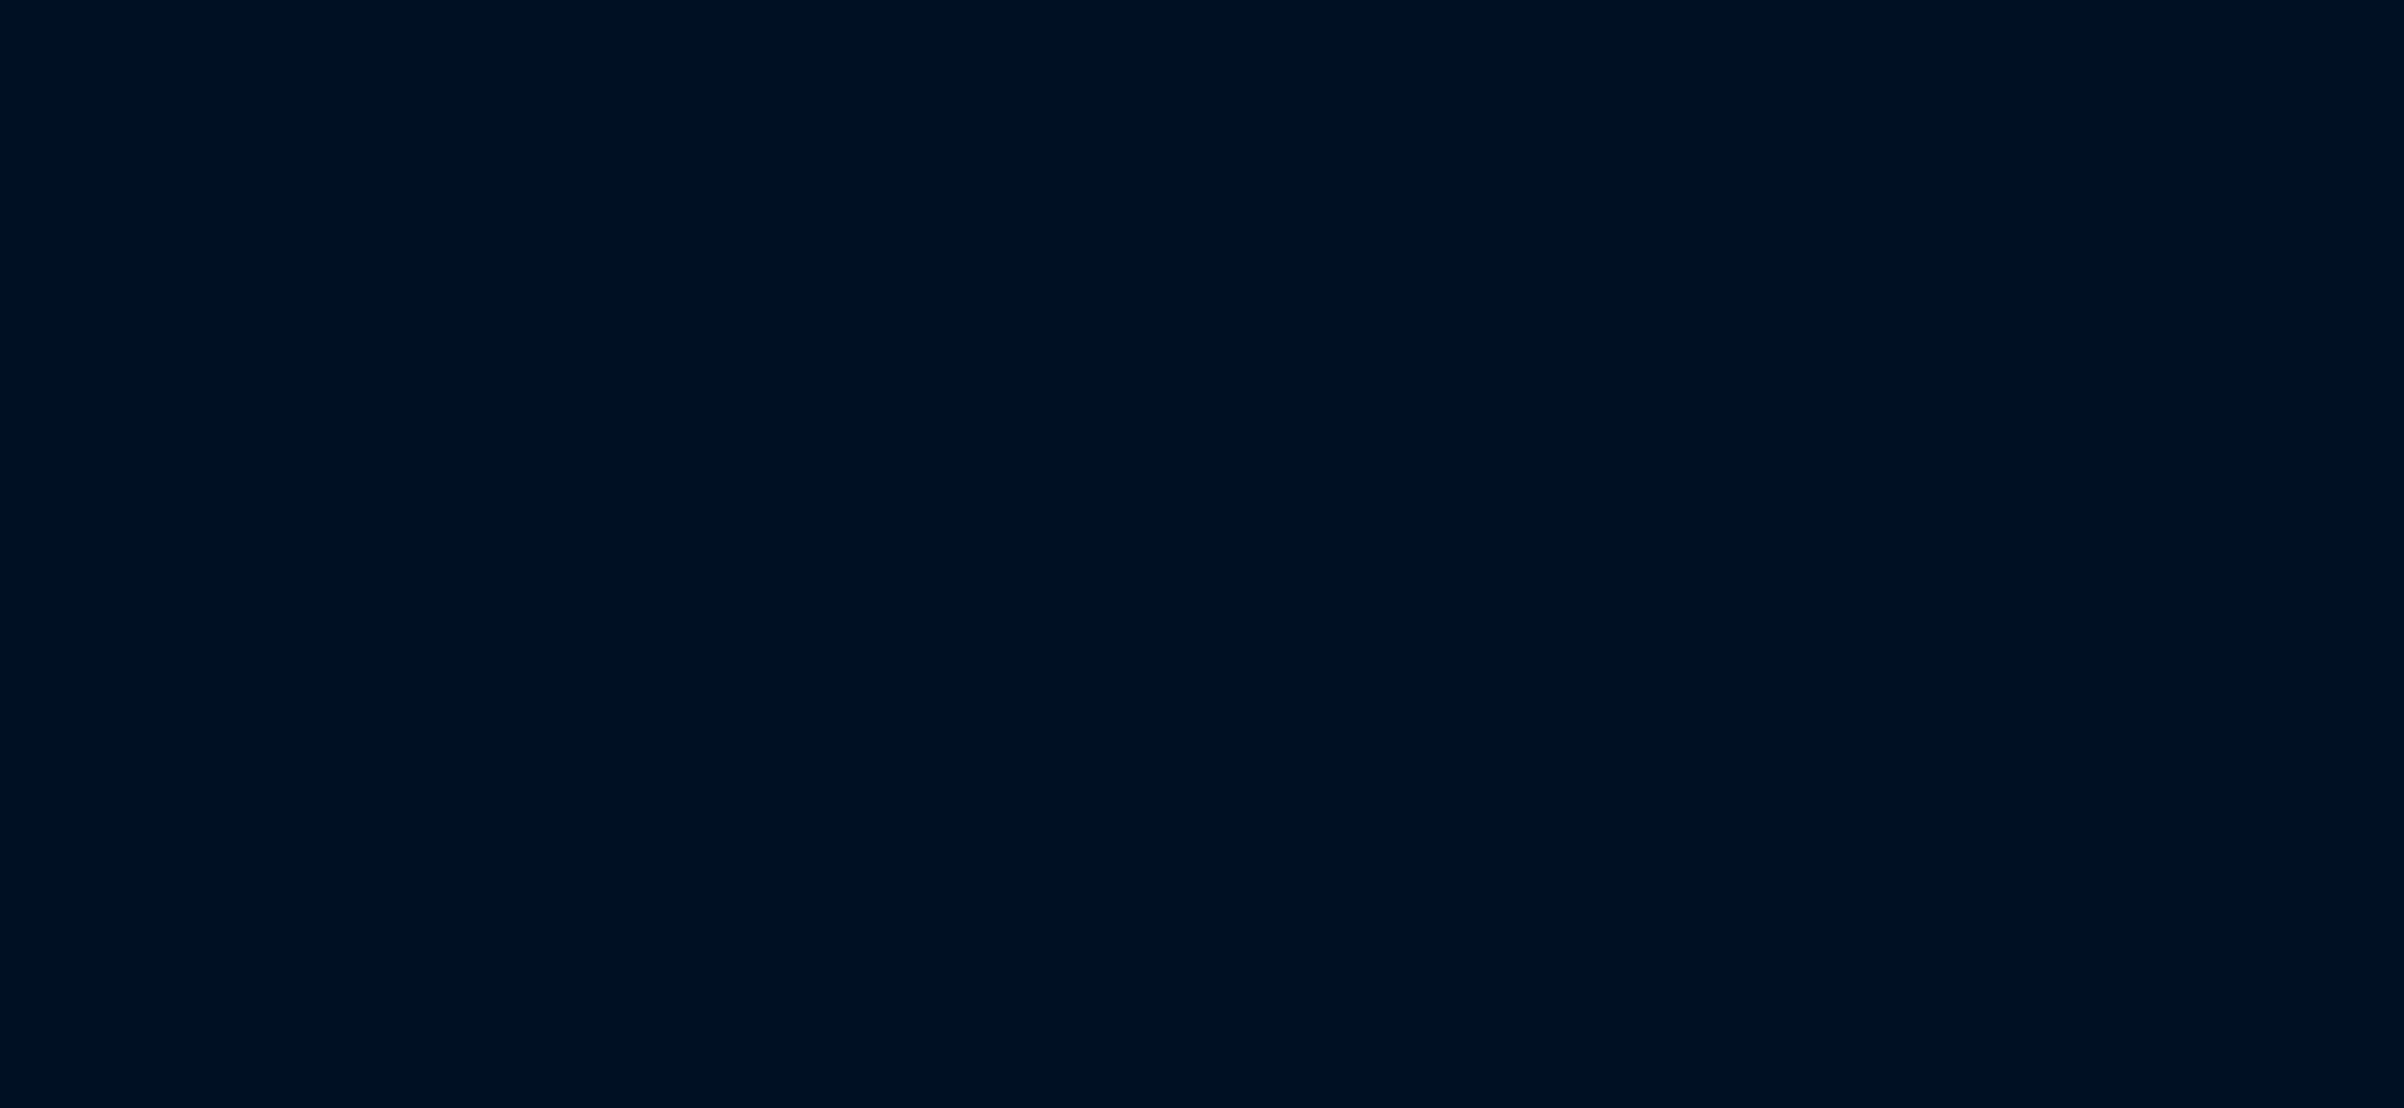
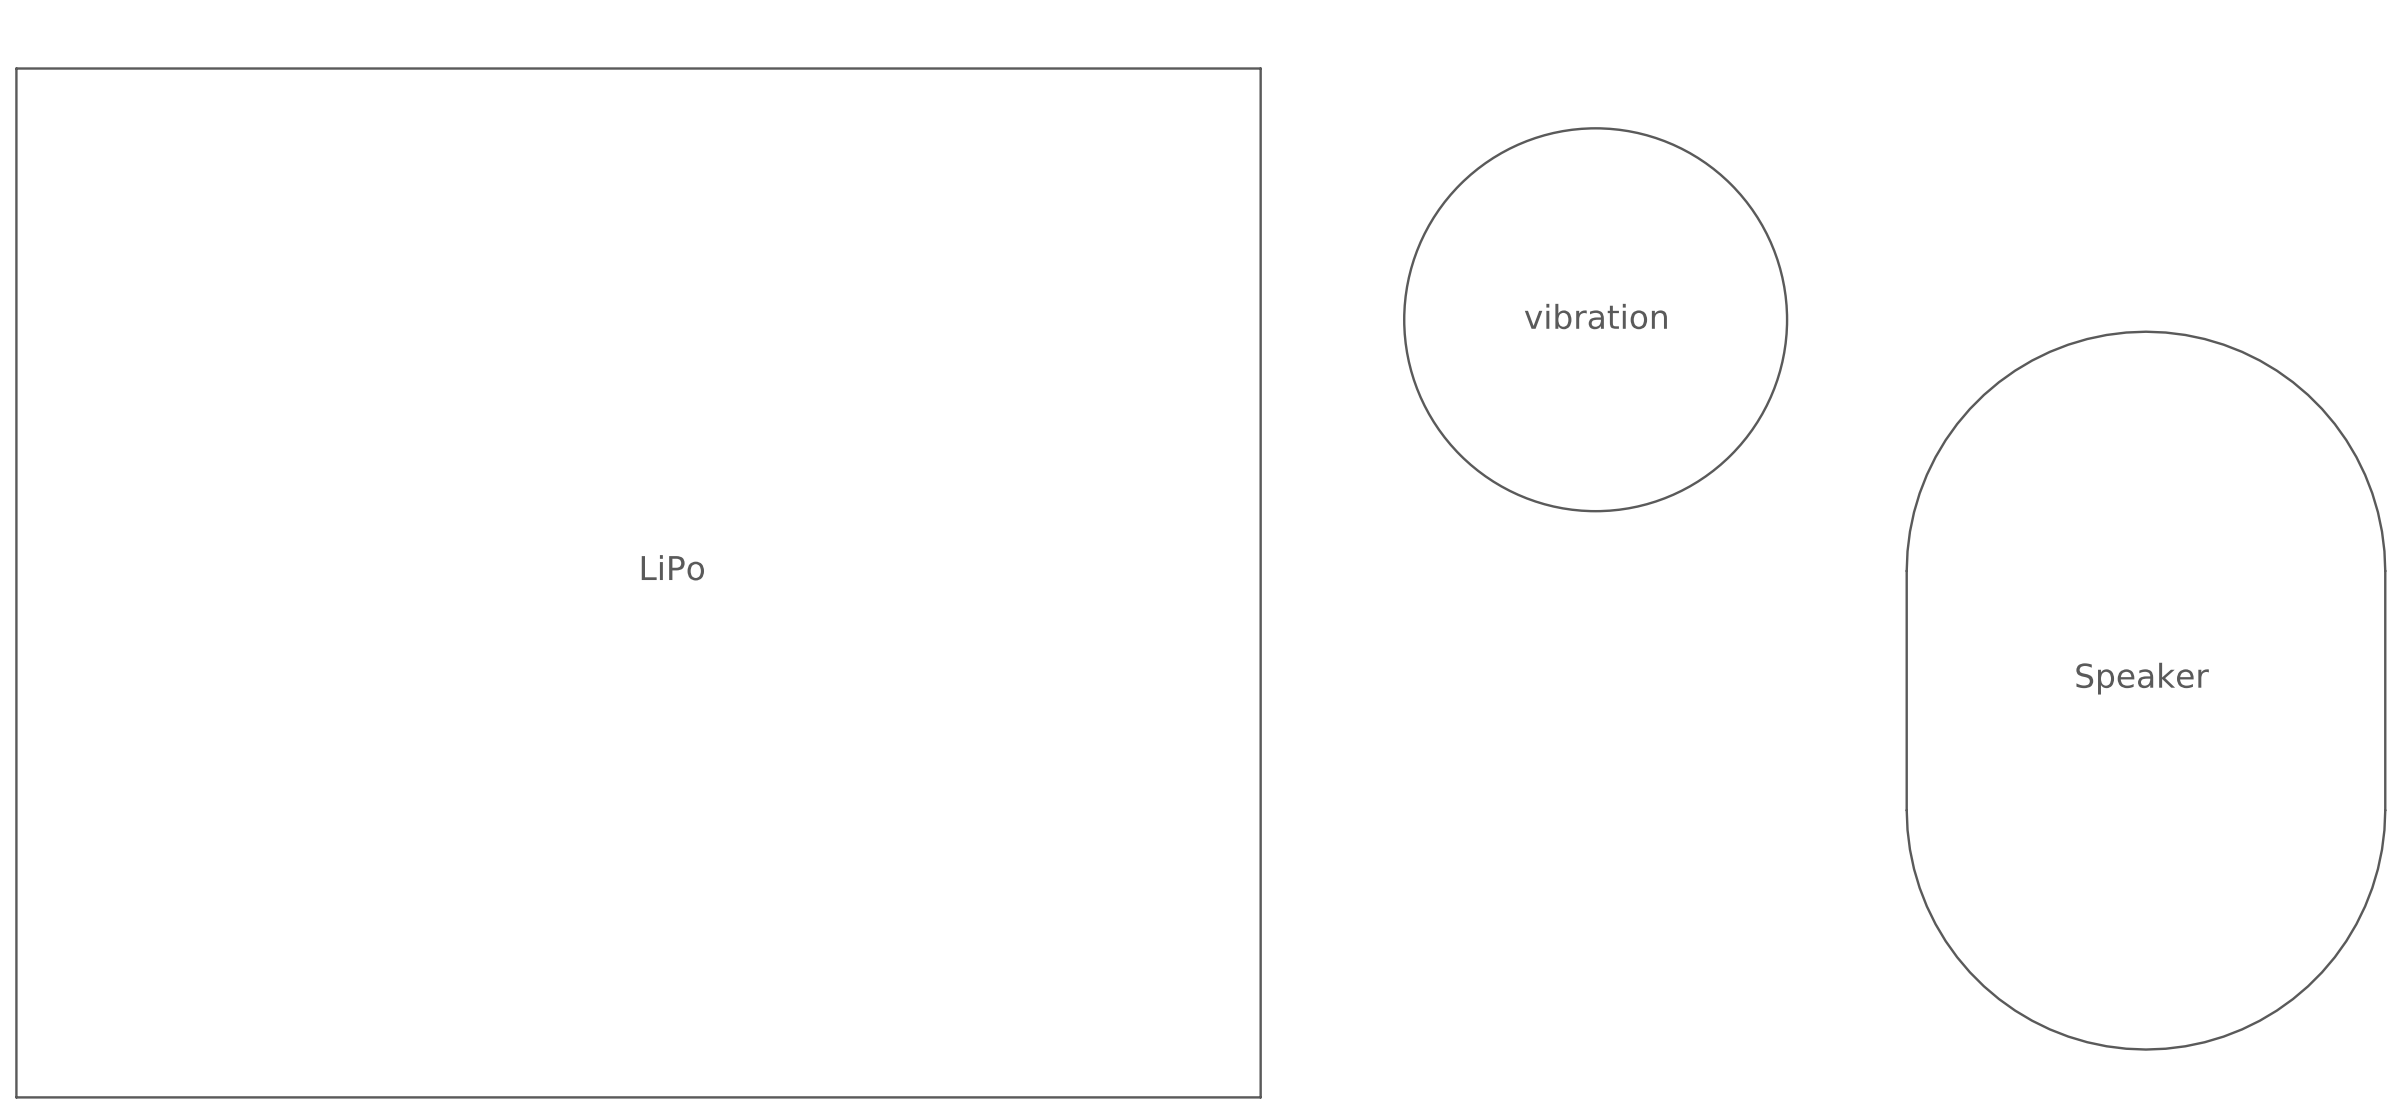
line: none -> (16, 68) (1260, 68) (1260, 1097) (16, 1097) (16, 68)
drawing: none -> [1403, 127, 1789, 513]
text: none -> vibration (1595, 316)
text: none -> LiPo (672, 567)
line: none -> (1906, 570) (1906, 810) (1909, 849) (1919, 887) (1935, 924) (1945, 941) (1969, 972) (1999, 999) (2032, 1020) (2068, 1036) (2087, 1042) (2126, 1048) (2165, 1048) (2204, 1042) (2223, 1036) (2259, 1020) (2276, 1010) (2308, 986) (2322, 972) (2346, 941) (2365, 906) (2377, 869) (2384, 830) (2385, 810) (2385, 570) (2382, 531) (2372, 493) (2356, 457) (2346, 440) (2322, 408) (2292, 382) (2259, 360) (2242, 351) (2204, 339) (2165, 332) (2126, 332) (2087, 339) (2049, 351) (2015, 370) (1983, 394) (1969, 408) (1945, 440) (1935, 457) (1919, 493) (1909, 531) (1906, 570)
text: none -> Speaker (2142, 678)

